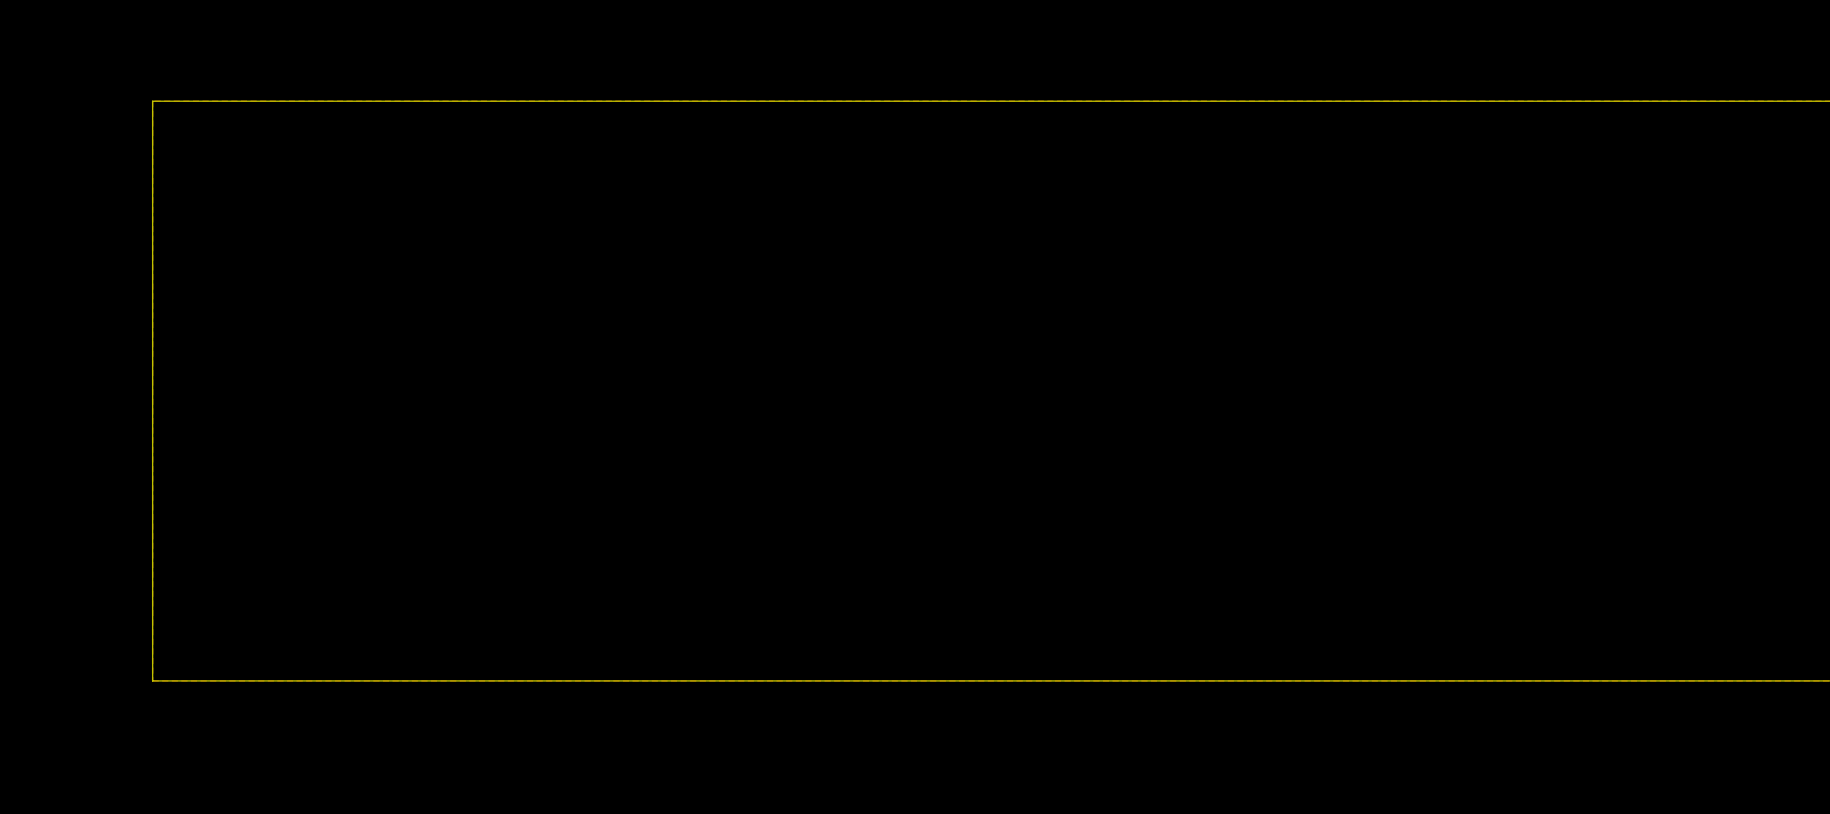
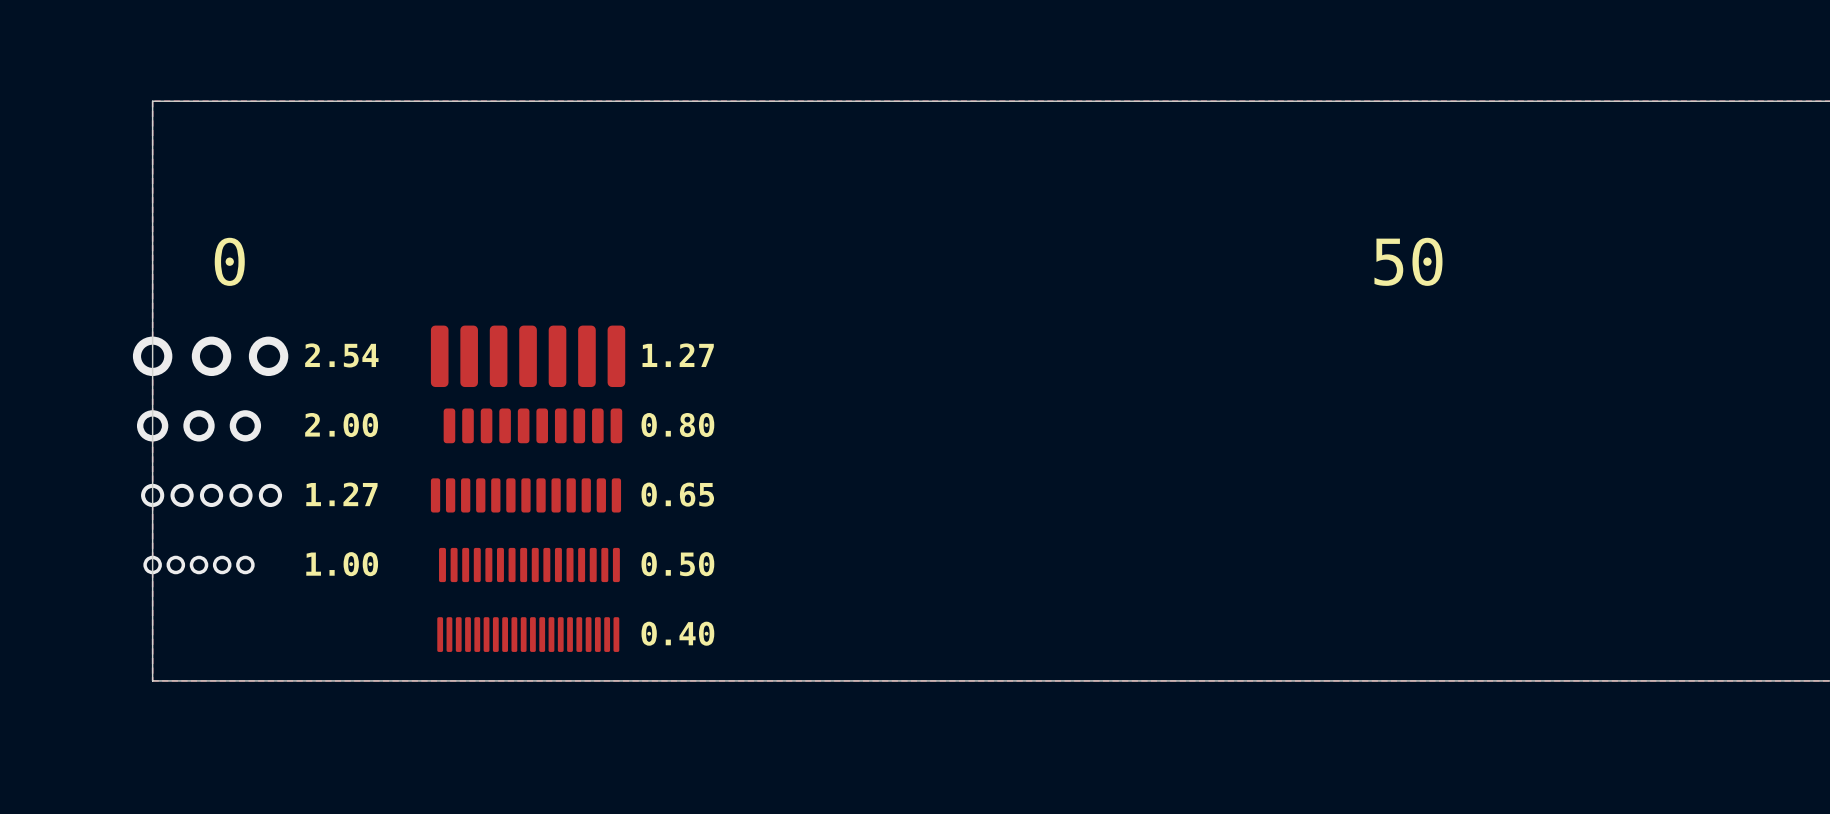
text: none -> 0 (229, 261)
text: none -> 50 (1408, 261)
text: none -> 2.54 (341, 355)
text: none -> 1.27 (678, 355)
via: none -> (152, 356)
via: none -> (211, 356)
via: none -> (268, 356)
part: none -> (439, 356)
part: none -> (469, 356)
part: none -> (498, 356)
part: none -> (528, 356)
part: none -> (557, 356)
part: none -> (586, 356)
part: none -> (616, 356)
text: none -> 2.00 (341, 425)
text: none -> 0.80 (677, 425)
via: none -> (152, 425)
via: none -> (199, 425)
via: none -> (245, 425)
part: none -> (449, 425)
part: none -> (468, 425)
part: none -> (486, 425)
part: none -> (505, 425)
part: none -> (523, 425)
part: none -> (542, 425)
part: none -> (560, 425)
part: none -> (579, 425)
part: none -> (597, 425)
part: none -> (616, 425)
text: none -> 1.27 (341, 494)
text: none -> 0.65 (677, 494)
via: none -> (152, 495)
via: none -> (182, 495)
via: none -> (211, 495)
via: none -> (240, 495)
via: none -> (270, 495)
part: none -> (435, 495)
part: none -> (450, 495)
part: none -> (465, 495)
part: none -> (480, 495)
part: none -> (495, 495)
part: none -> (510, 495)
part: none -> (525, 495)
part: none -> (541, 495)
part: none -> (556, 495)
part: none -> (571, 495)
part: none -> (586, 495)
part: none -> (601, 495)
part: none -> (616, 495)
via: none -> (152, 564)
via: none -> (175, 564)
via: none -> (199, 564)
via: none -> (222, 564)
via: none -> (245, 564)
text: none -> 1.00 (342, 564)
part: none -> (442, 564)
part: none -> (454, 564)
part: none -> (465, 564)
part: none -> (477, 564)
part: none -> (488, 564)
part: none -> (500, 564)
part: none -> (512, 564)
part: none -> (523, 564)
part: none -> (535, 564)
part: none -> (546, 564)
part: none -> (558, 564)
part: none -> (570, 564)
part: none -> (581, 564)
part: none -> (593, 564)
part: none -> (604, 564)
part: none -> (616, 564)
text: none -> 0.50 (677, 564)
text: none -> 0.40 (677, 633)
part: none -> (440, 634)
part: none -> (449, 634)
part: none -> (458, 634)
part: none -> (468, 634)
part: none -> (477, 634)
part: none -> (486, 634)
part: none -> (495, 634)
part: none -> (505, 634)
part: none -> (514, 634)
part: none -> (523, 634)
part: none -> (532, 634)
part: none -> (542, 634)
part: none -> (551, 634)
part: none -> (560, 634)
part: none -> (570, 634)
part: none -> (579, 634)
part: none -> (588, 634)
part: none -> (597, 634)
part: none -> (607, 634)
part: none -> (616, 634)

